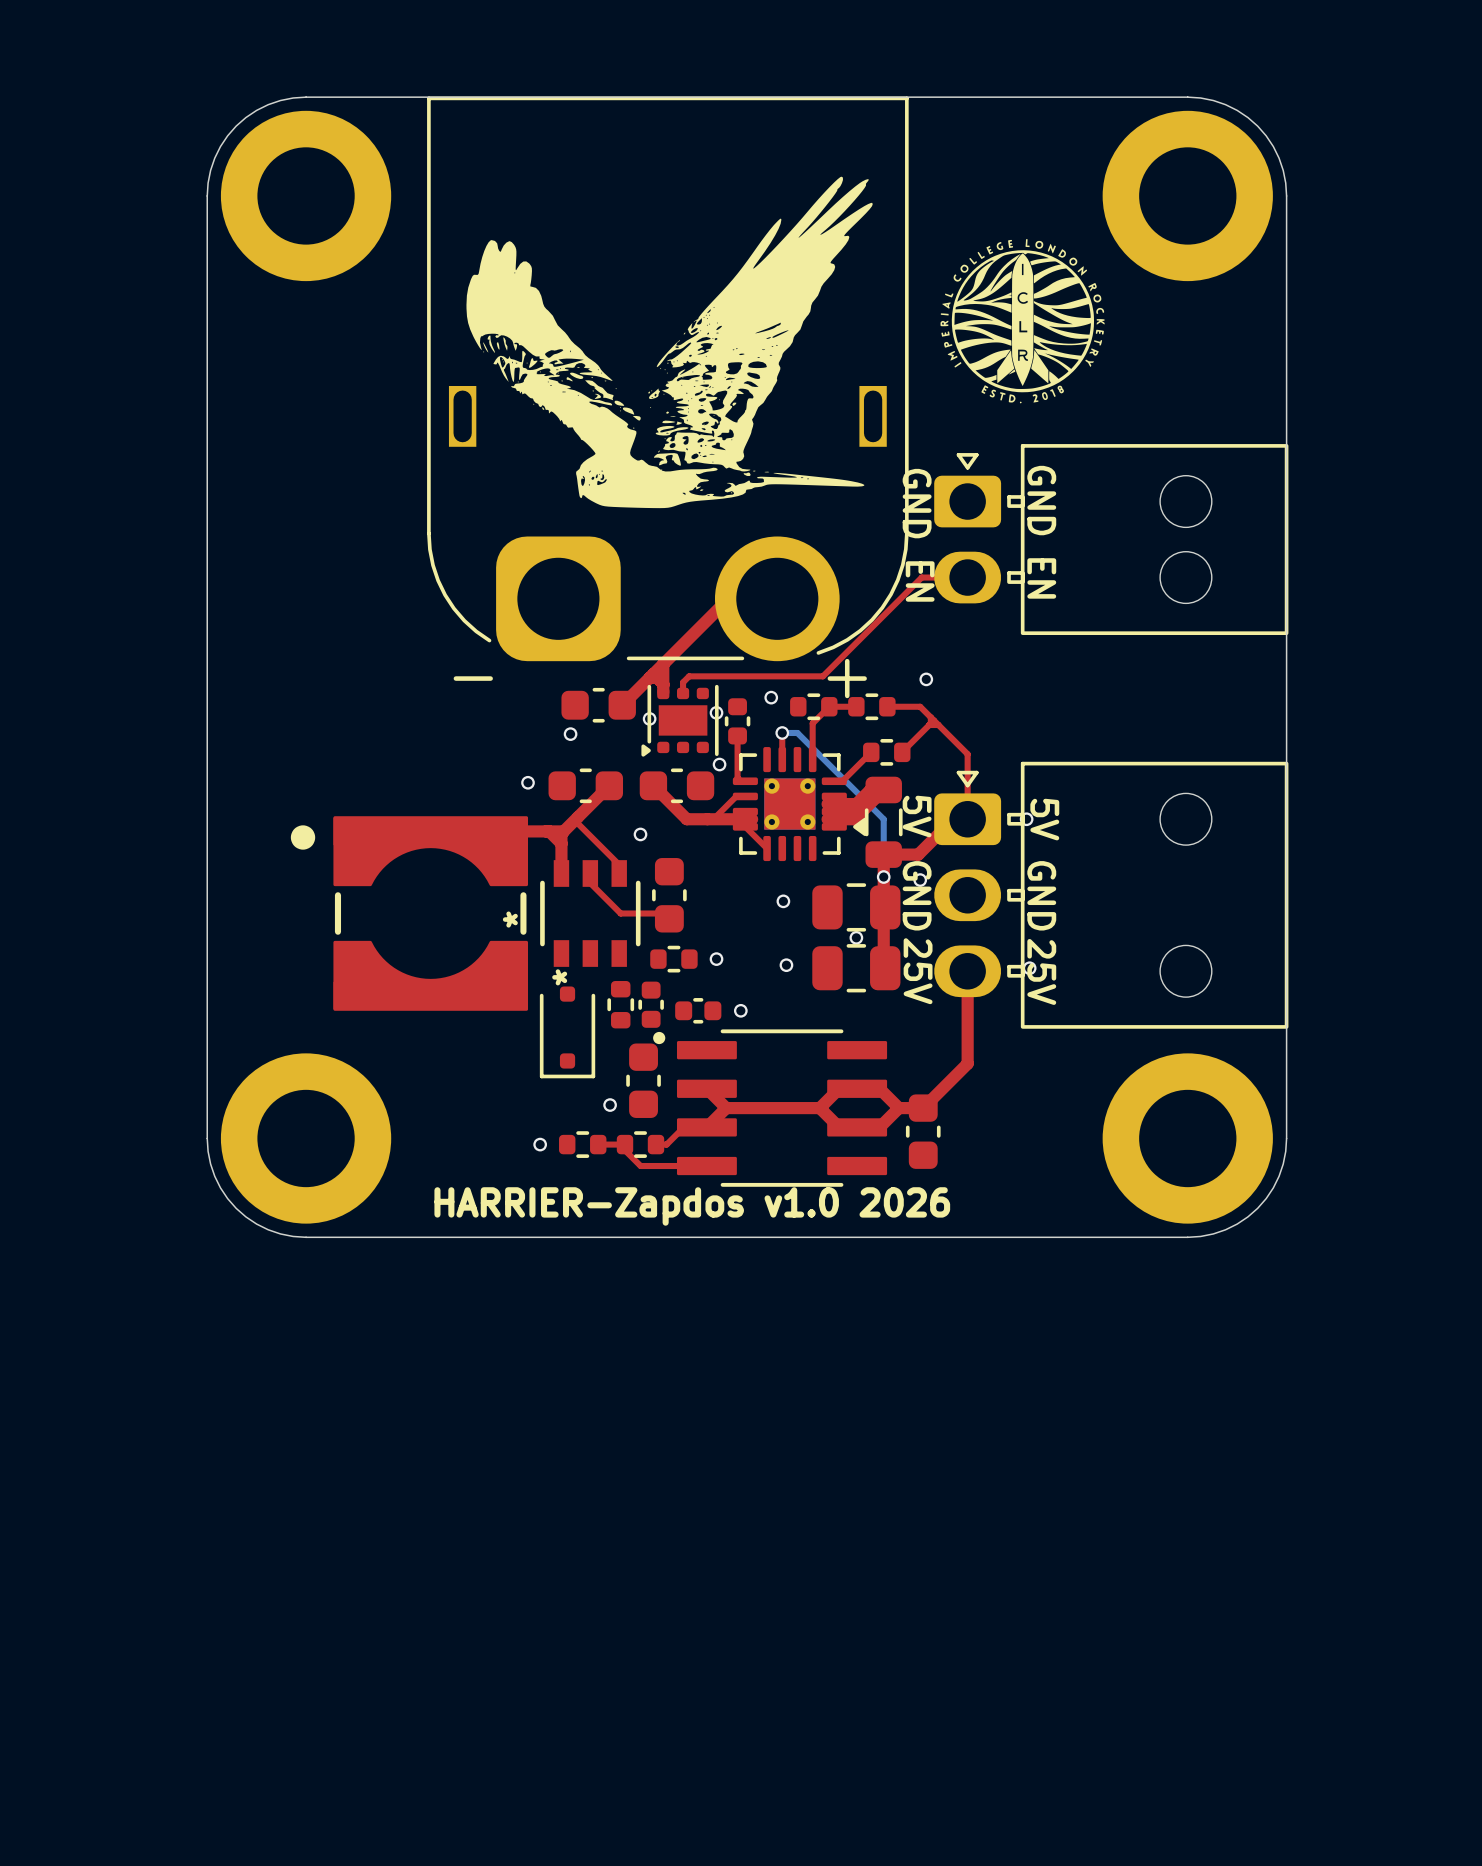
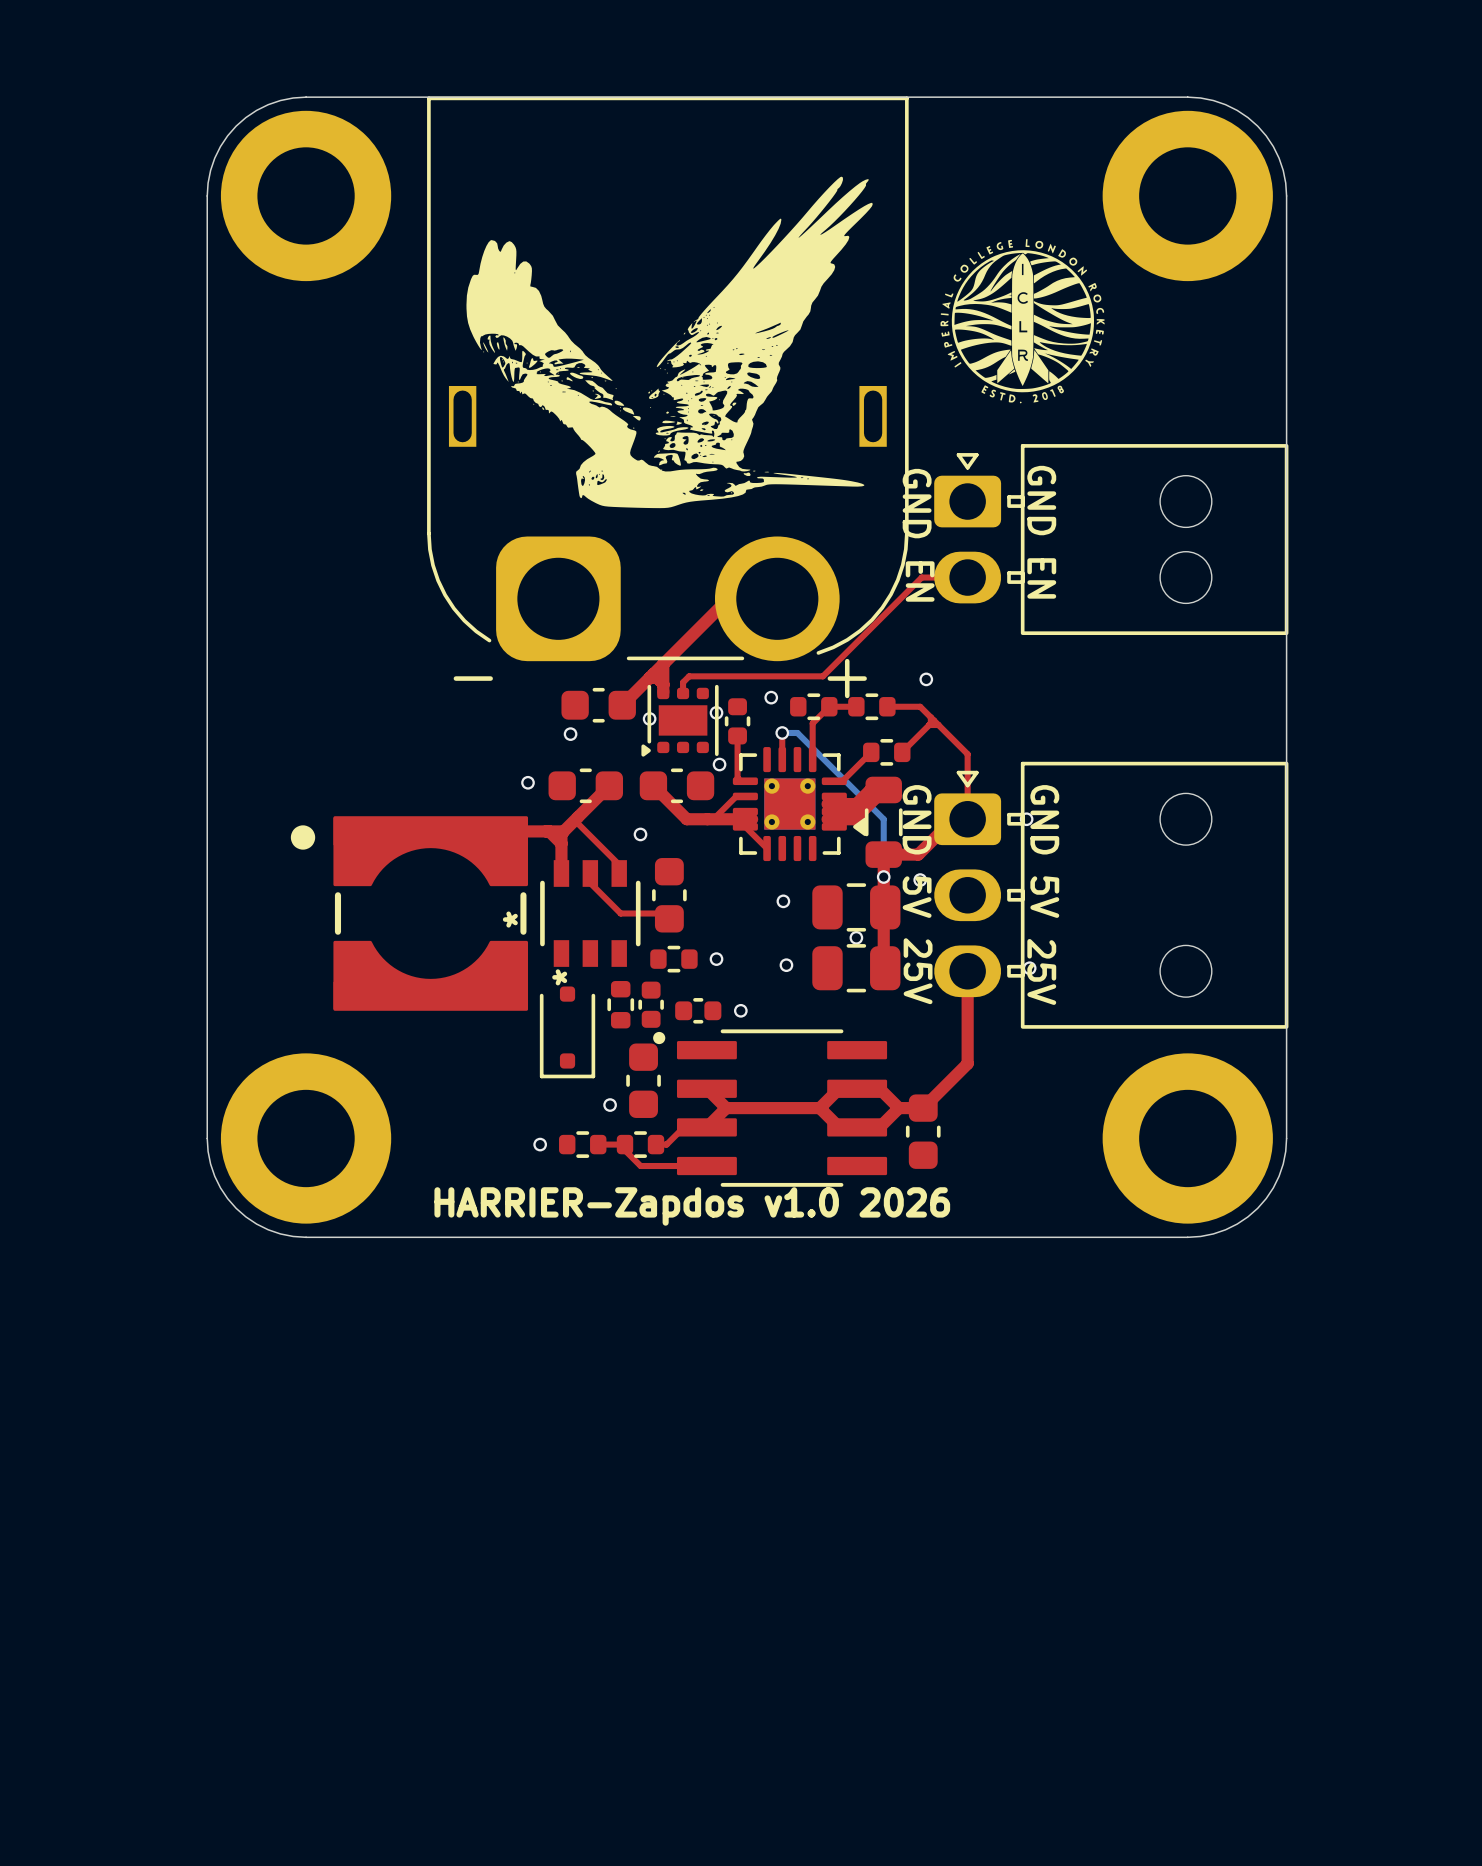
text: 5V (917, 816) -> GND (917, 819)
text: 5V (1044, 819) -> GND (1044, 819)
text: GND (917, 895) -> 5V (917, 897)
text: GND (1041, 895) -> 5V (1044, 897)

